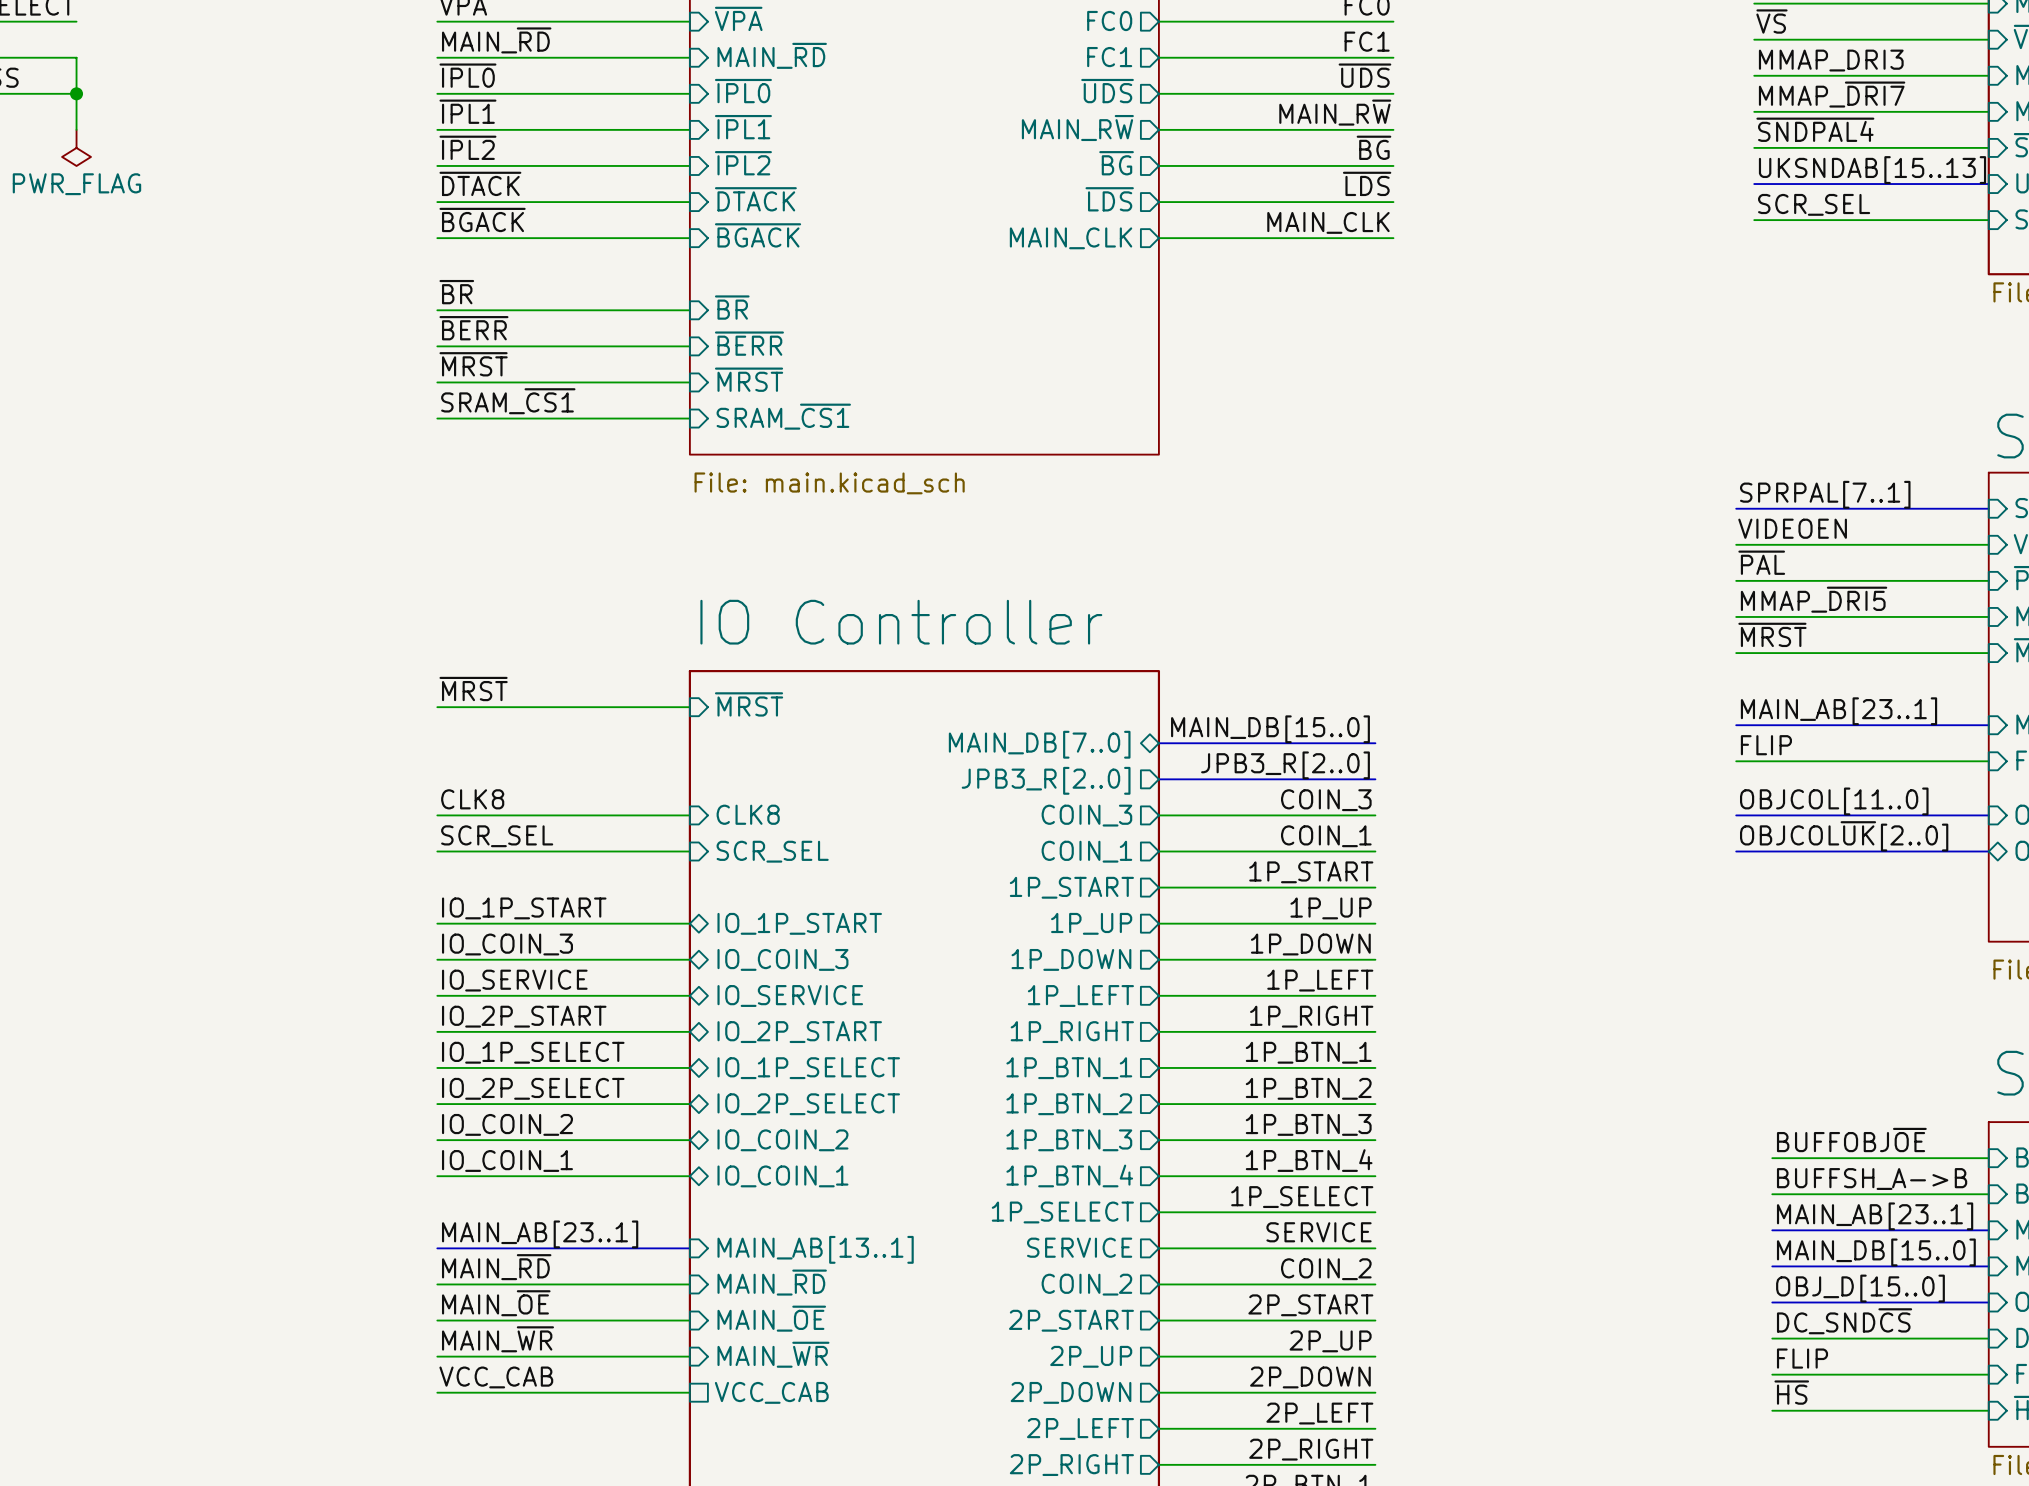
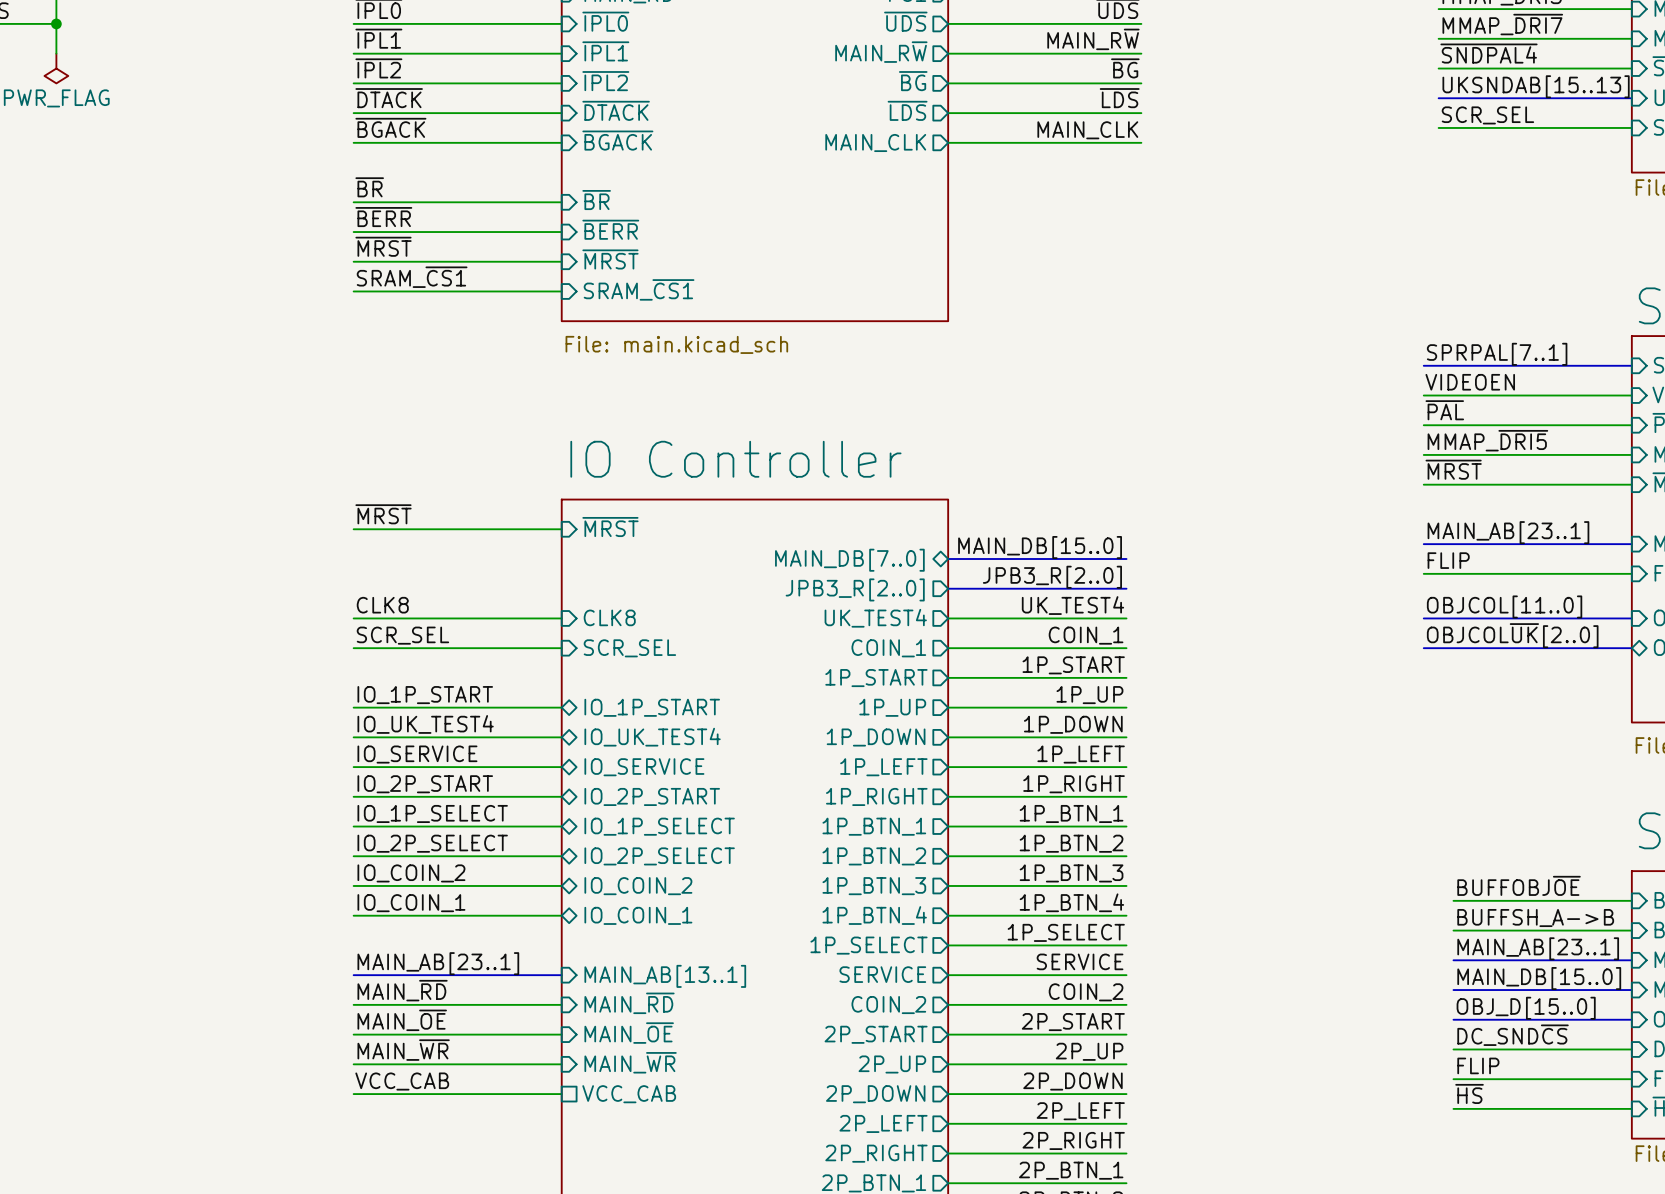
label: COIN_3 (1326, 800) -> UK_TEST4 (1072, 605)
sheet pin: COIN_3 (1086, 815) -> UK_TEST4 (875, 618)
label: IO_COIN_3 (507, 944) -> IO_UK_TEST4 (425, 724)
sheet pin: IO_COIN_3 (782, 959) -> IO_UK_TEST4 (652, 737)

